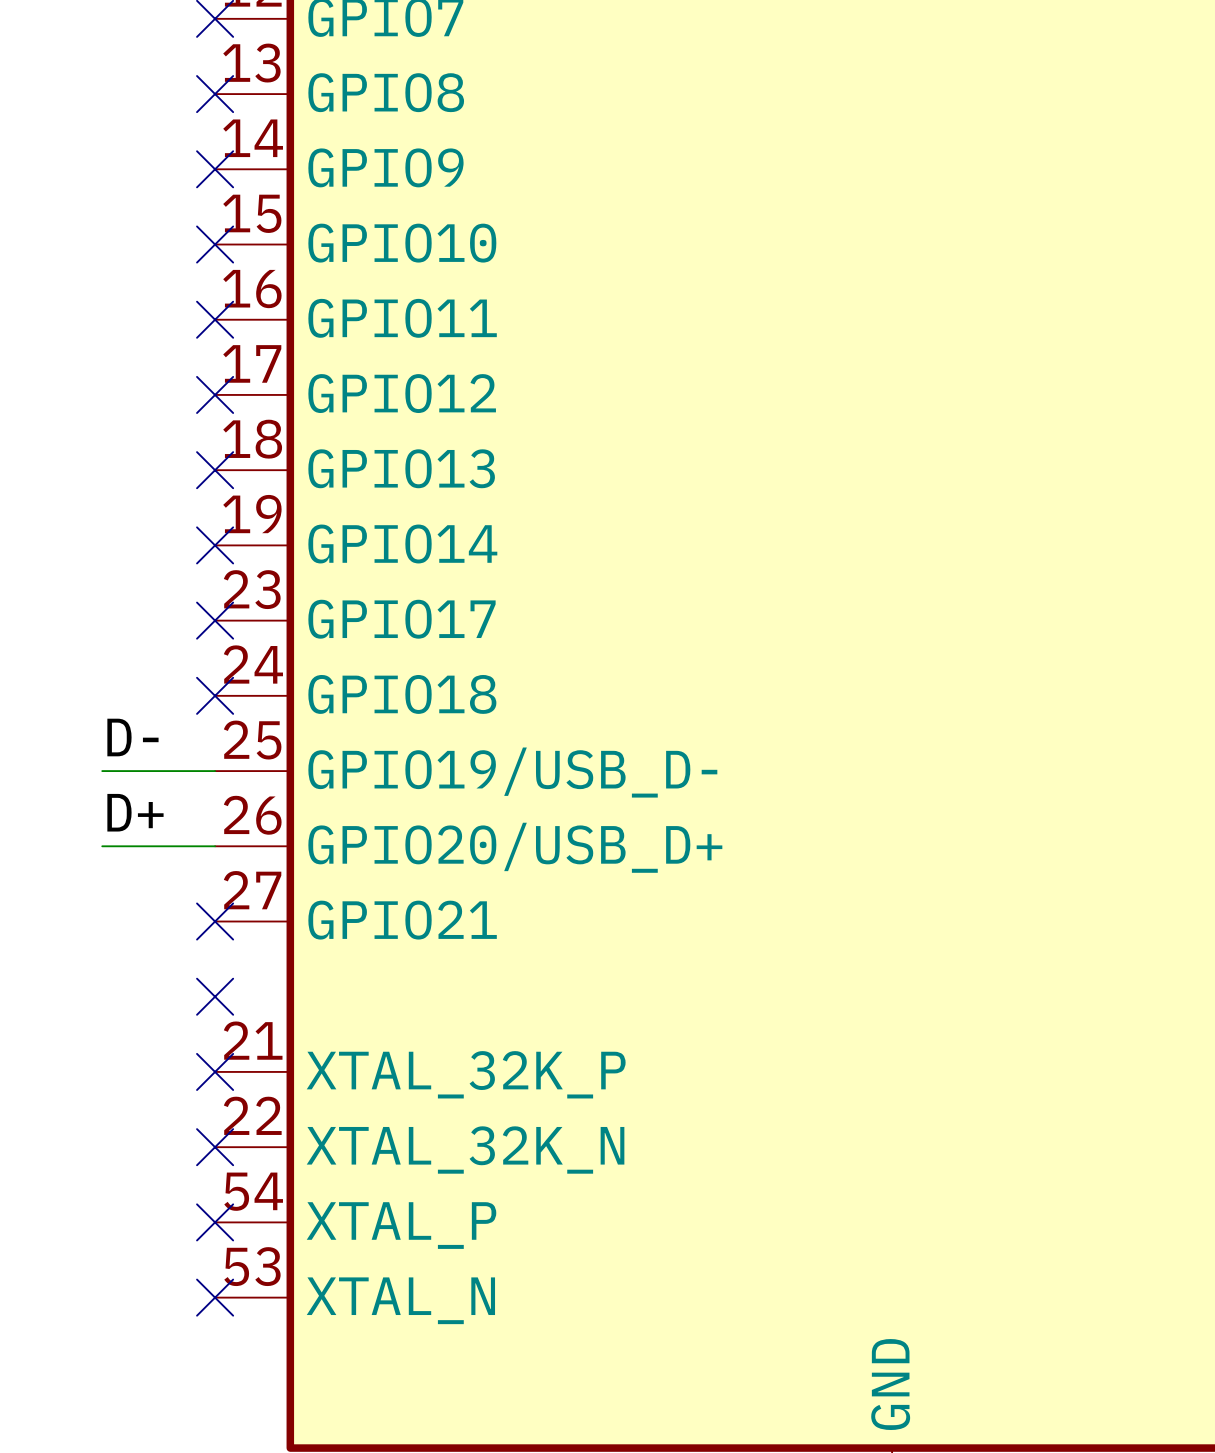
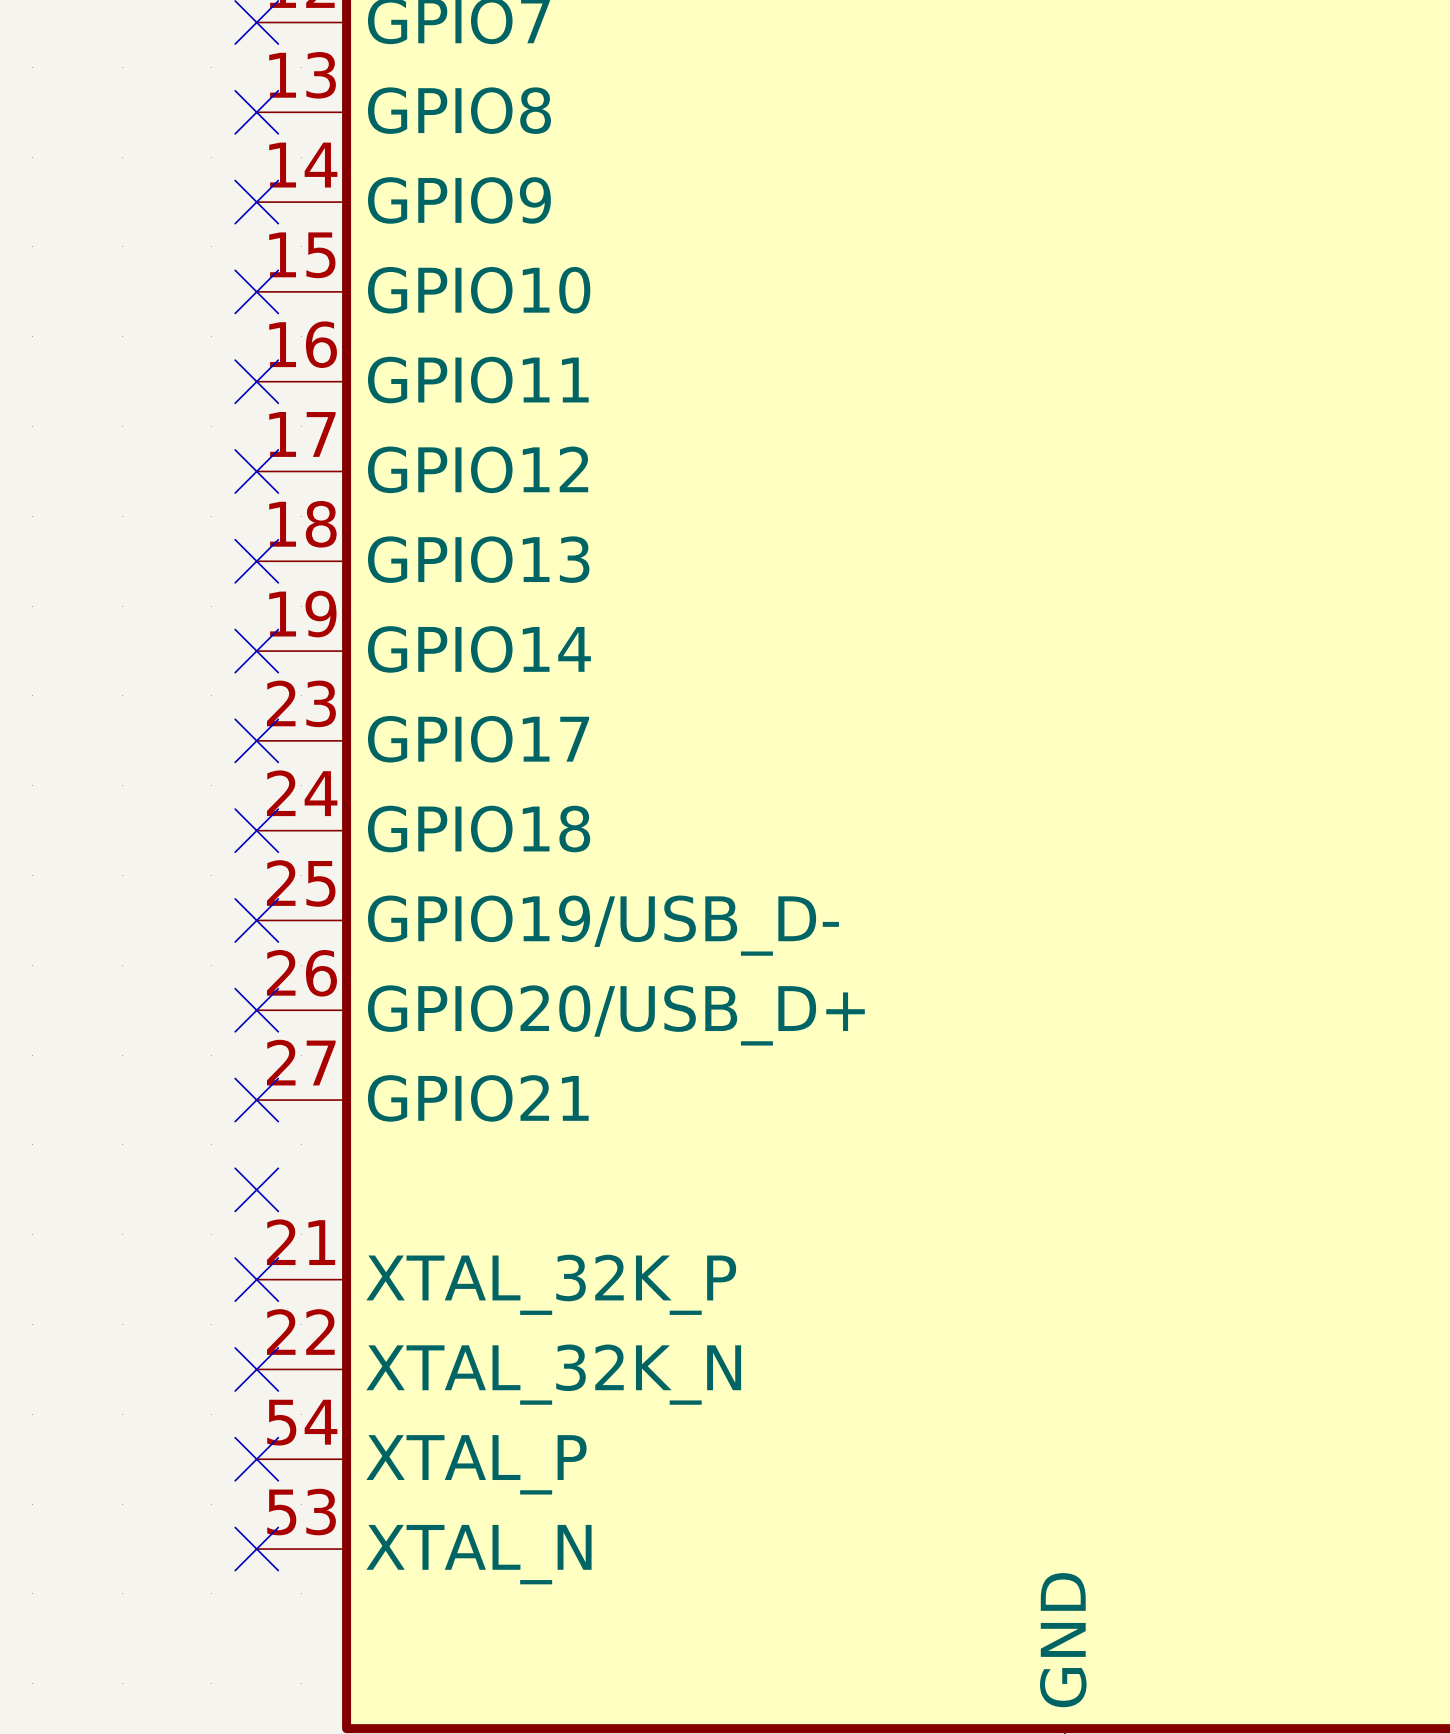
label: D- (132, 737) -> none
wire: (102, 771) (215, 771) -> none
no-connect mark: none -> (256, 920)
label: D+ (135, 812) -> none
wire: (102, 846) (215, 846) -> none
no-connect mark: none -> (256, 1010)

